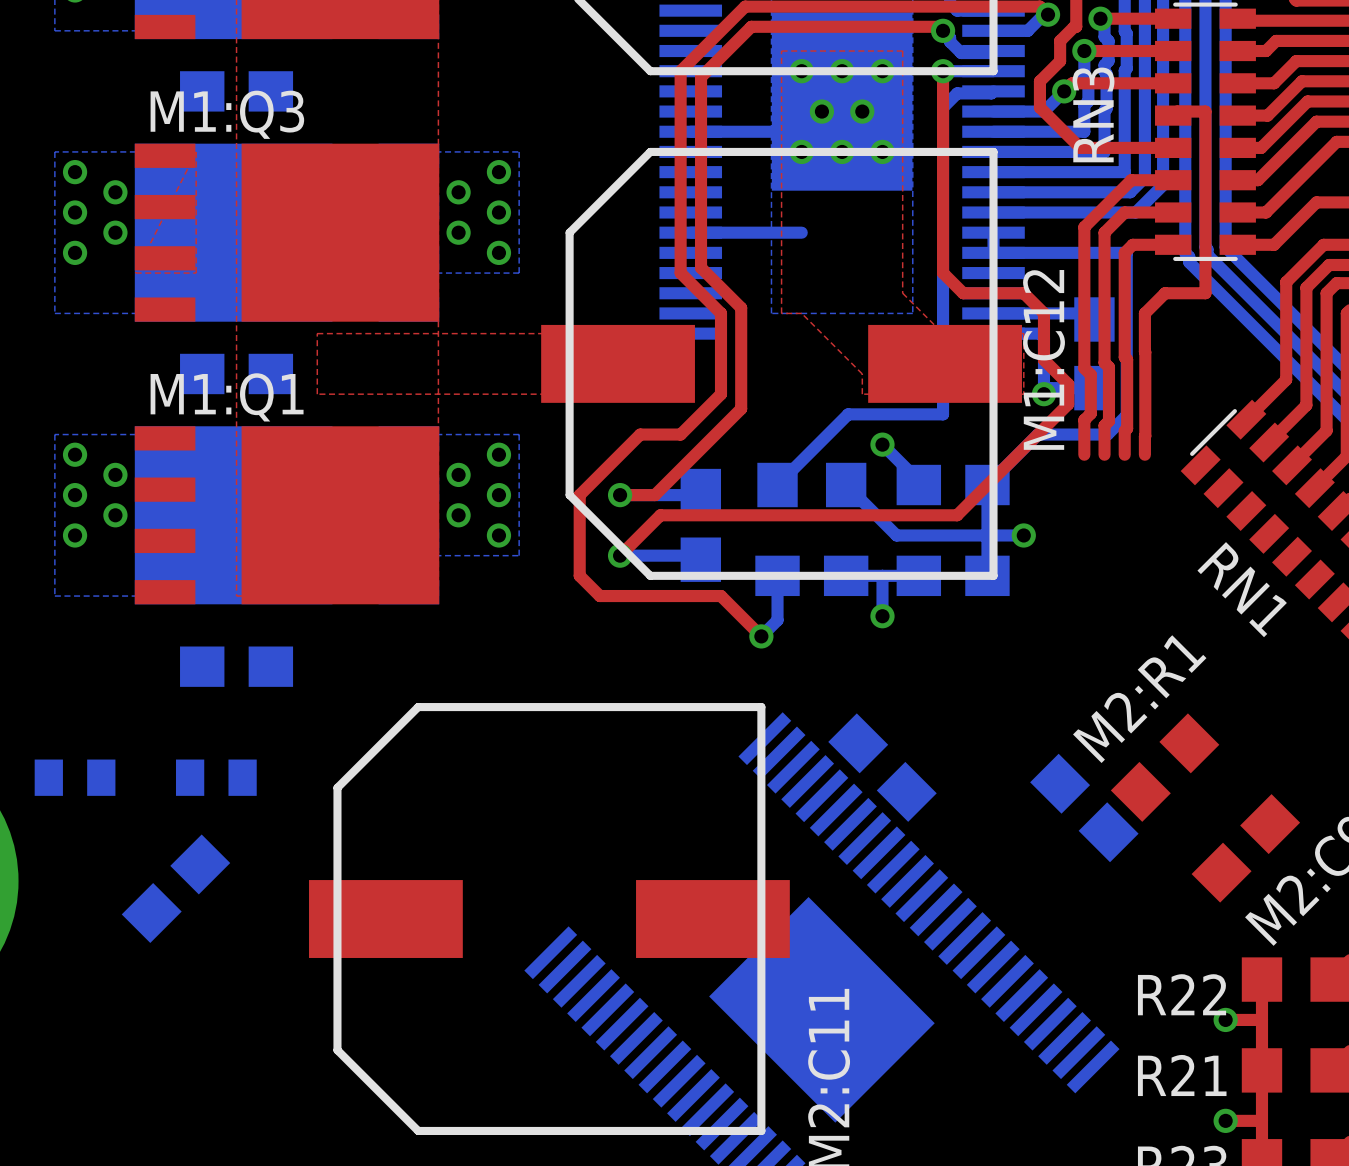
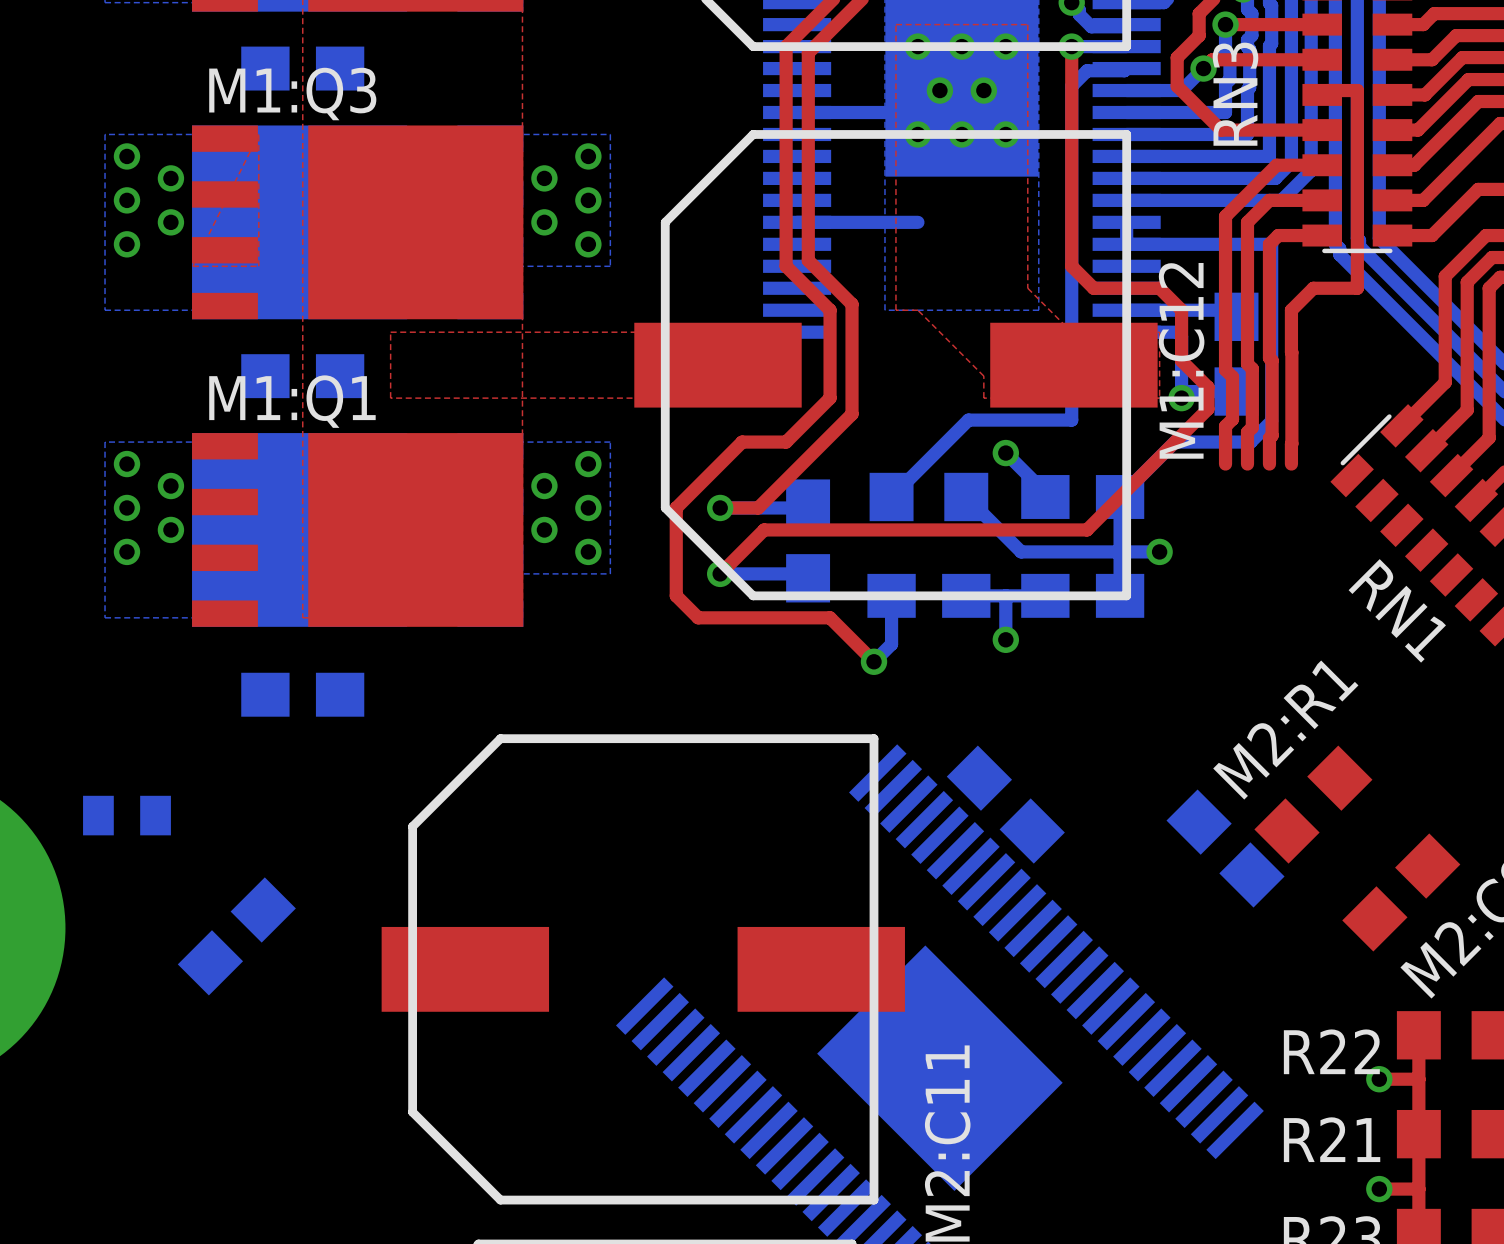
part: (216, 777) -> none

